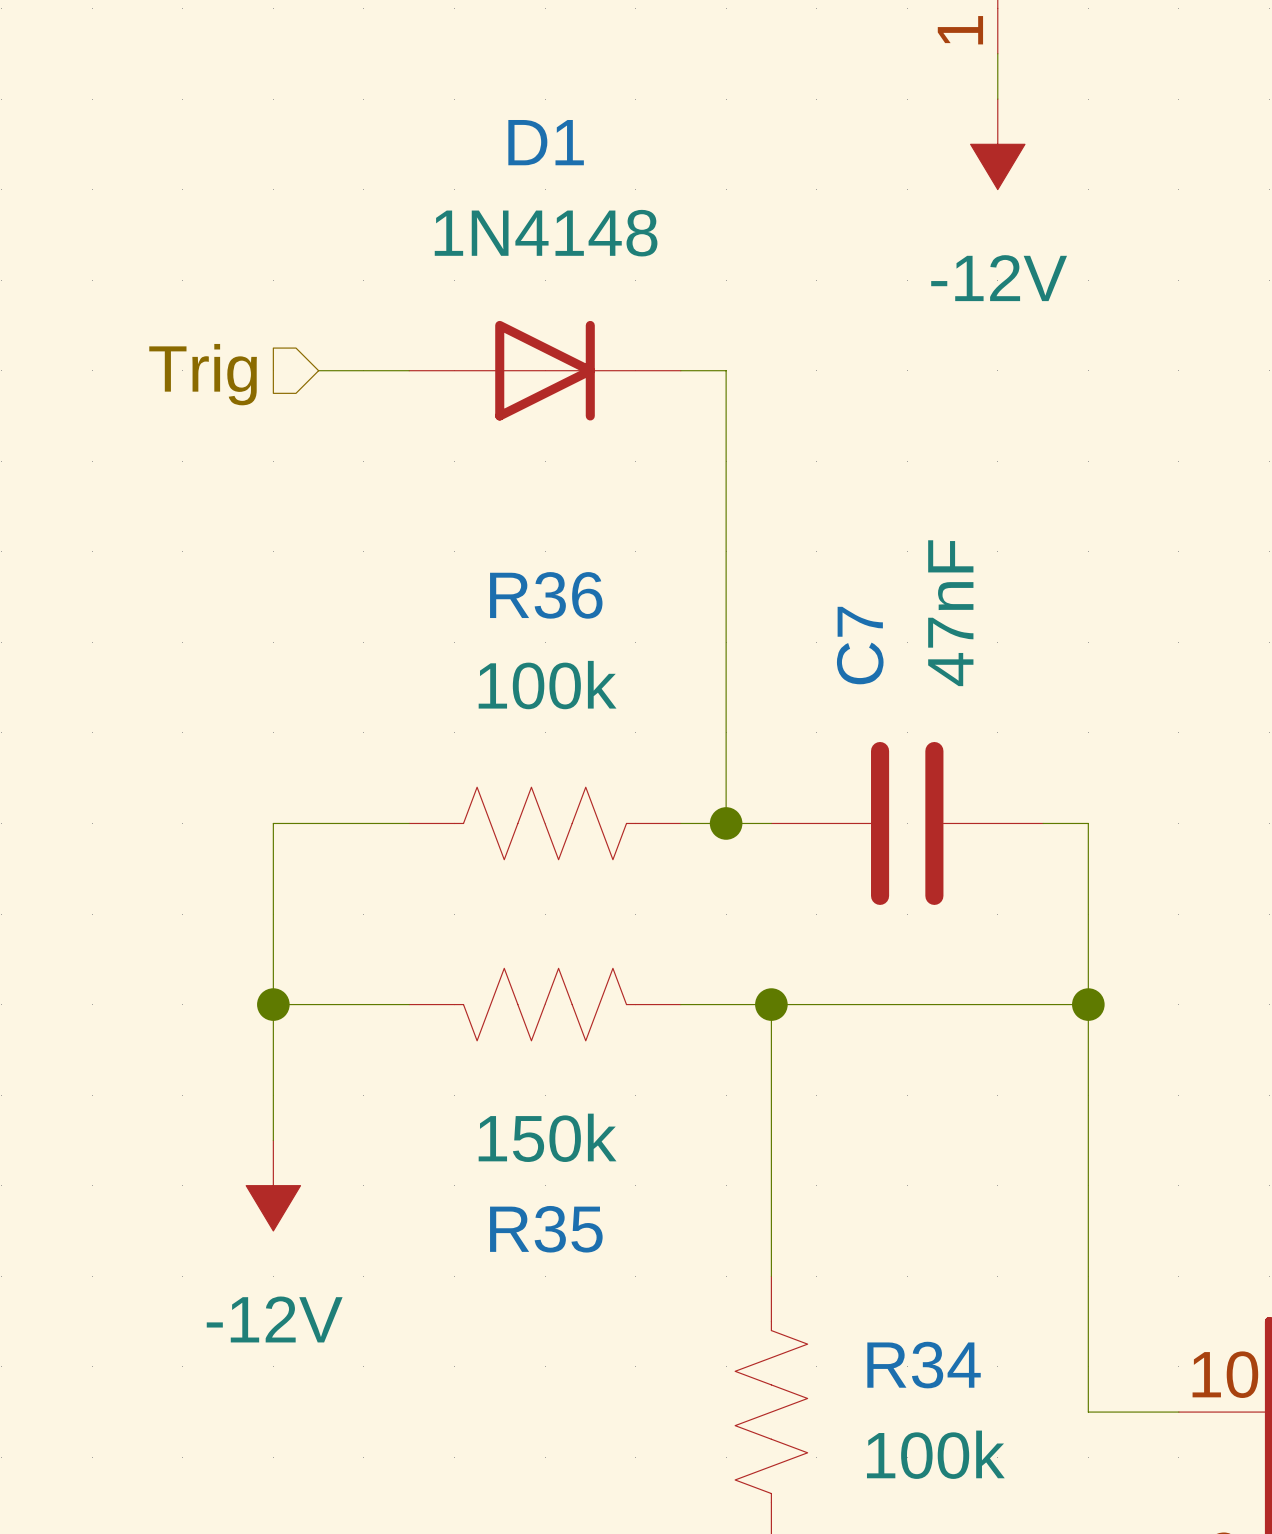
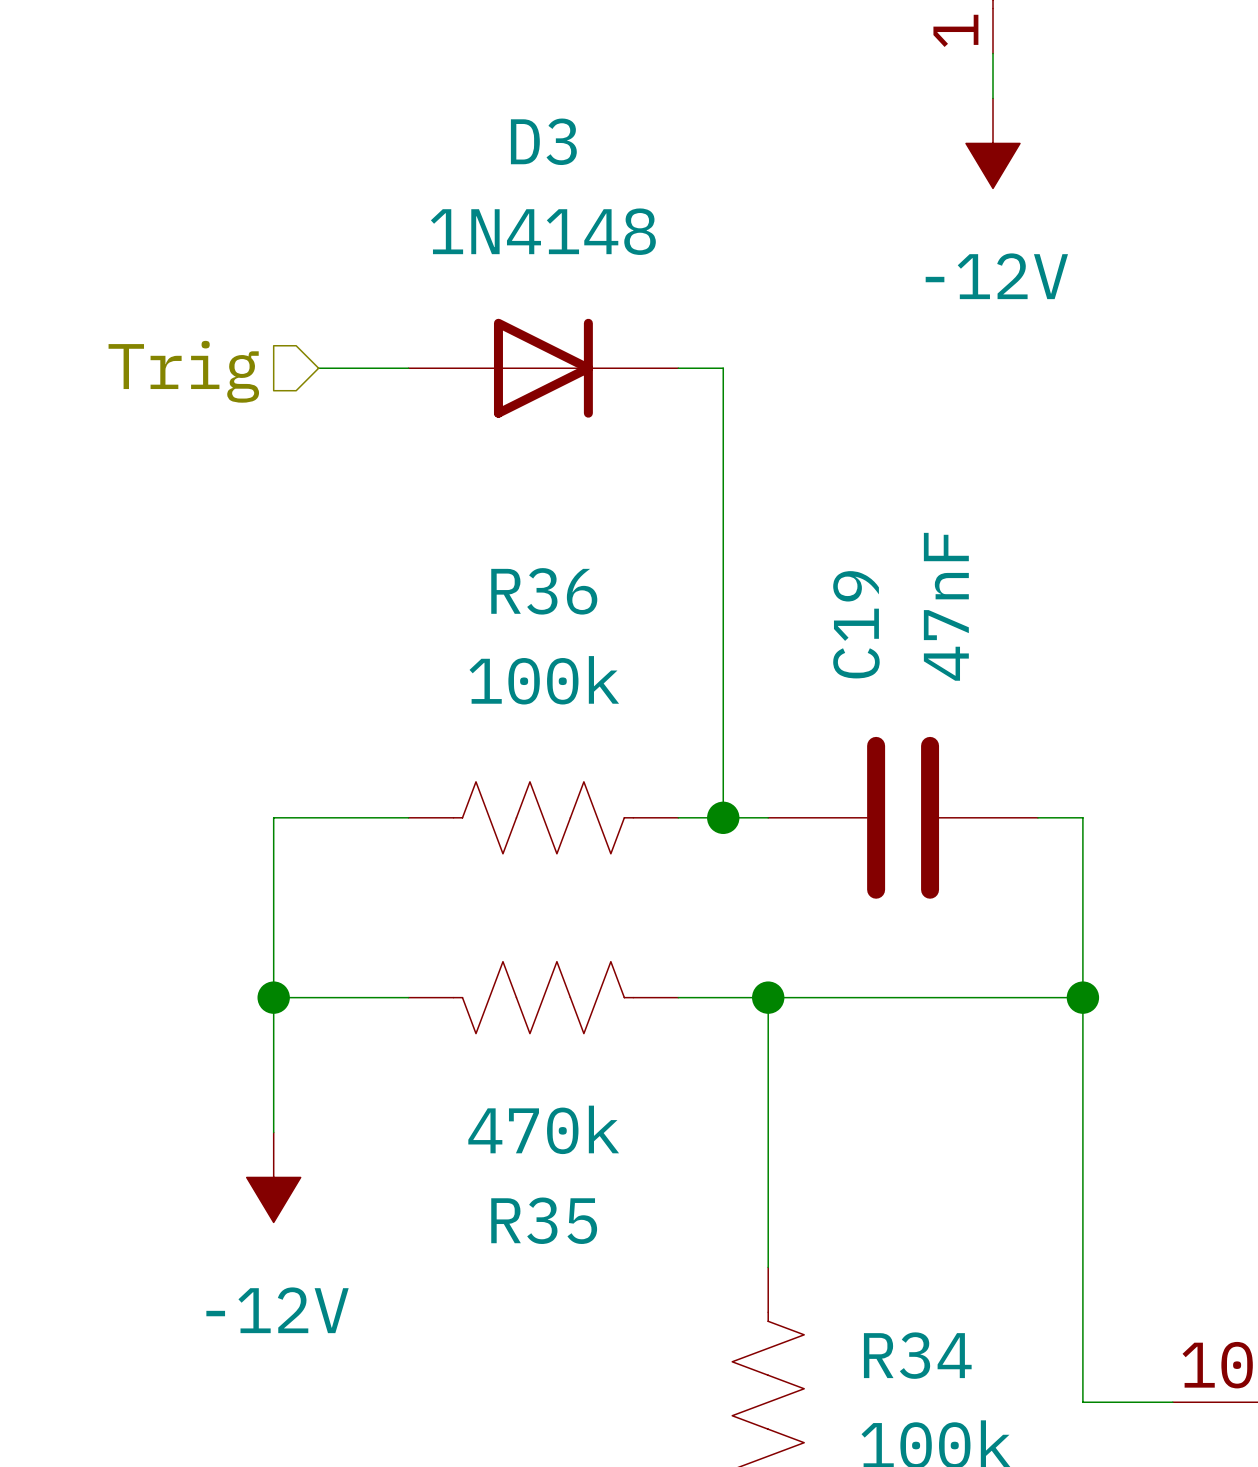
D1 name: D1 (546, 142) -> D3 (543, 141)
C7 name: C7 (860, 645) -> C19 (856, 624)
R35 value: 150k (547, 1137) -> 470k (543, 1129)

